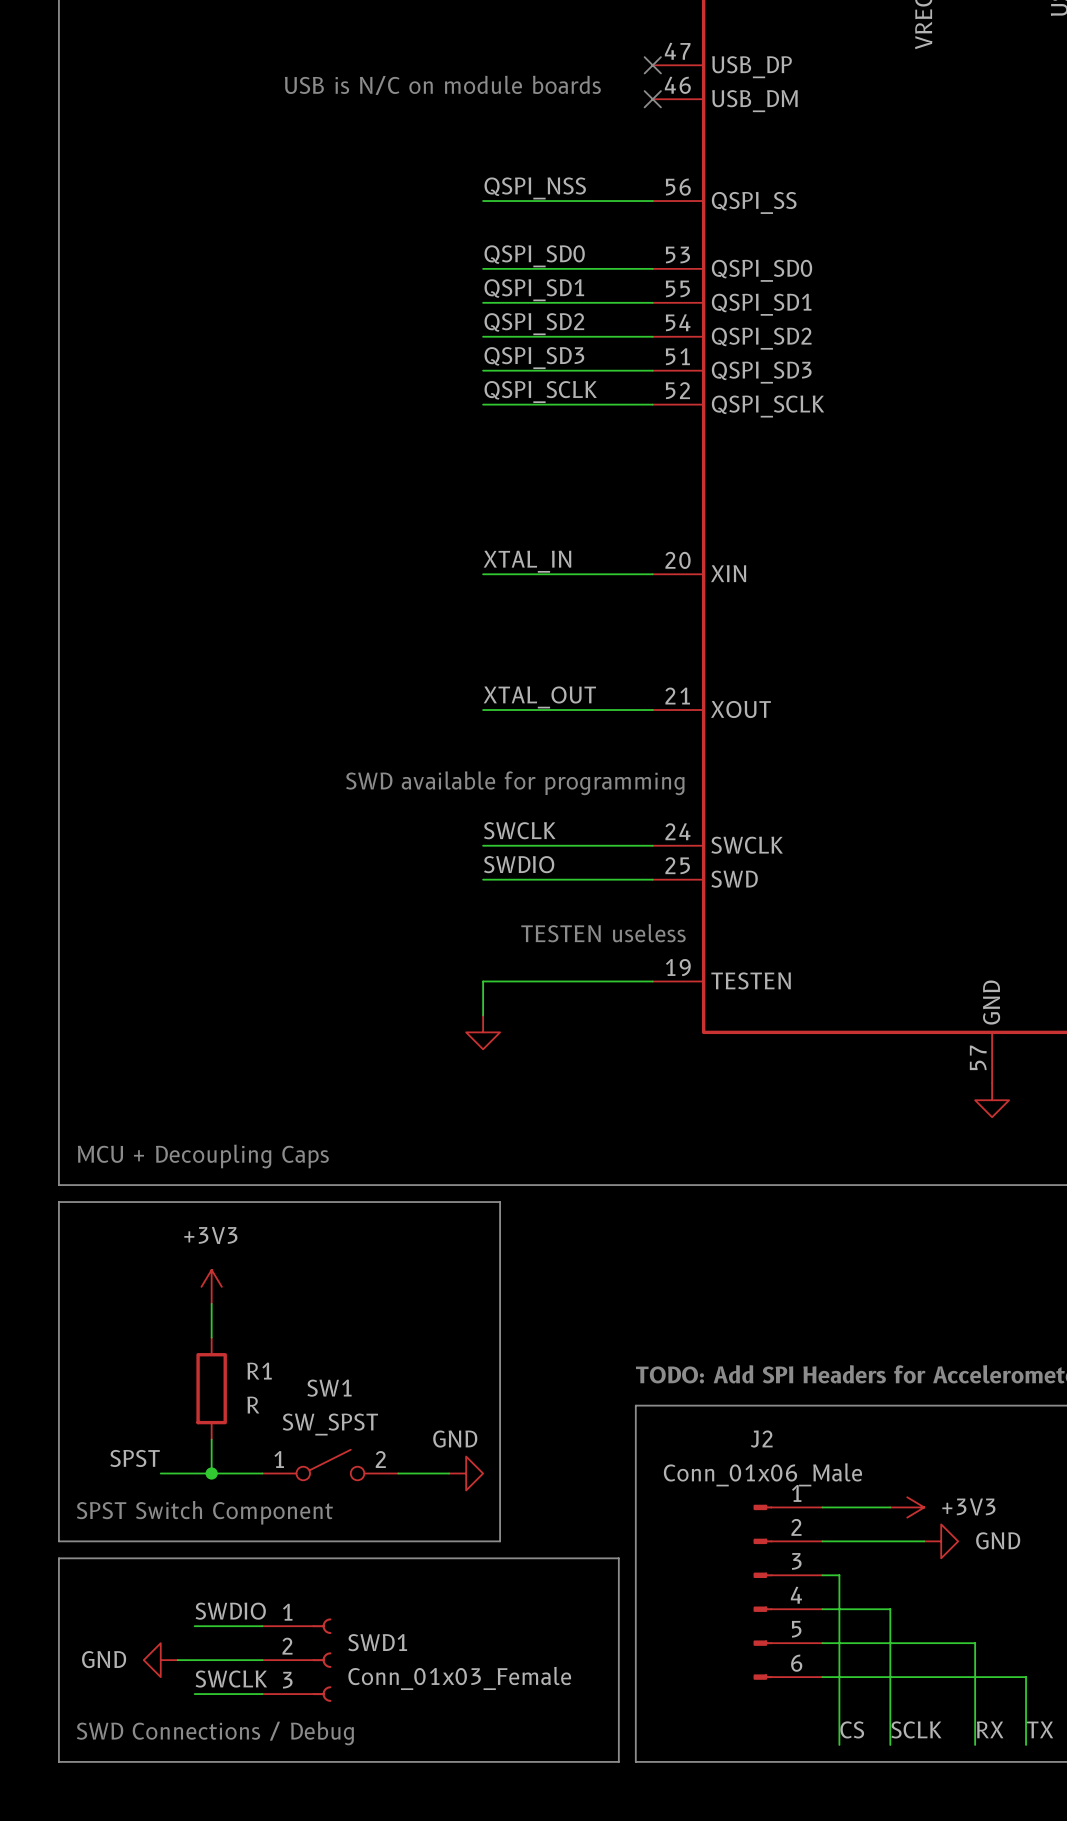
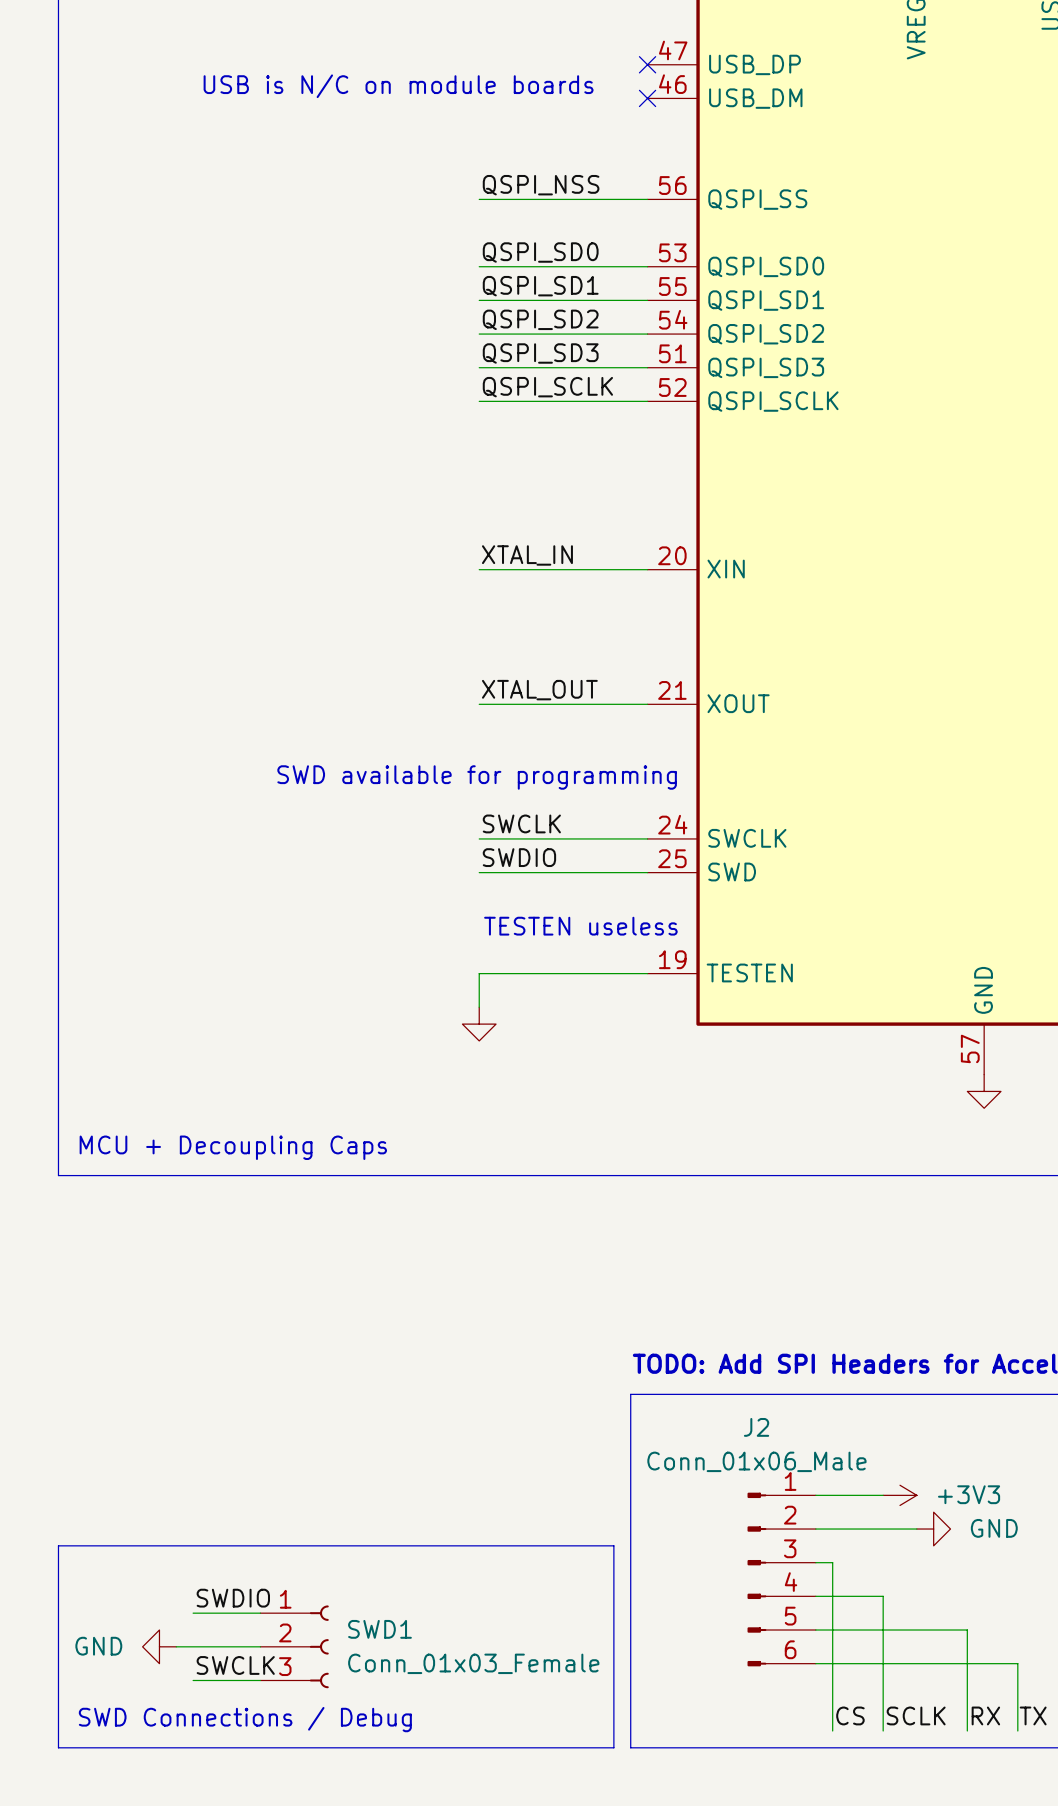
line: (58, 1202) (500, 1202) (500, 1541) (58, 1541) (58, 1202) -> none
power symbol: +3V3 (211, 1286) -> none
wire: (211, 1303) (211, 1337) -> none
R1: R (211, 1388) -> none
wire: (211, 1439) (211, 1473) -> none
label: SPST (135, 1458) -> none
SW1: SW_SPST (330, 1465) -> none
wire: (160, 1473) (262, 1473) -> none
junction: (211, 1473) -> none
wire: (398, 1473) (449, 1473) -> none
power symbol: GND (466, 1473) -> none
text: SPST Switch Component (204, 1512) -> none

